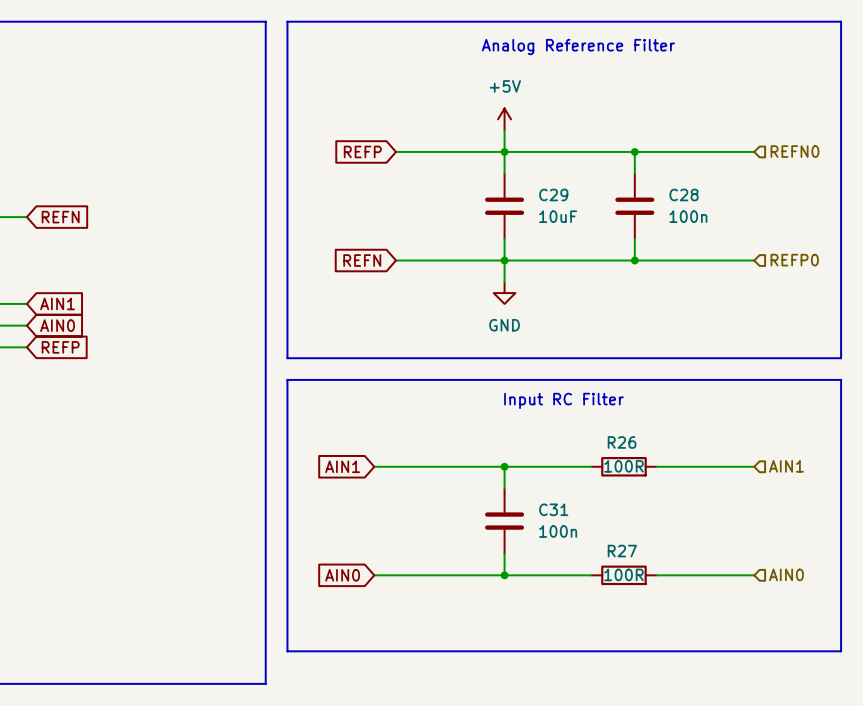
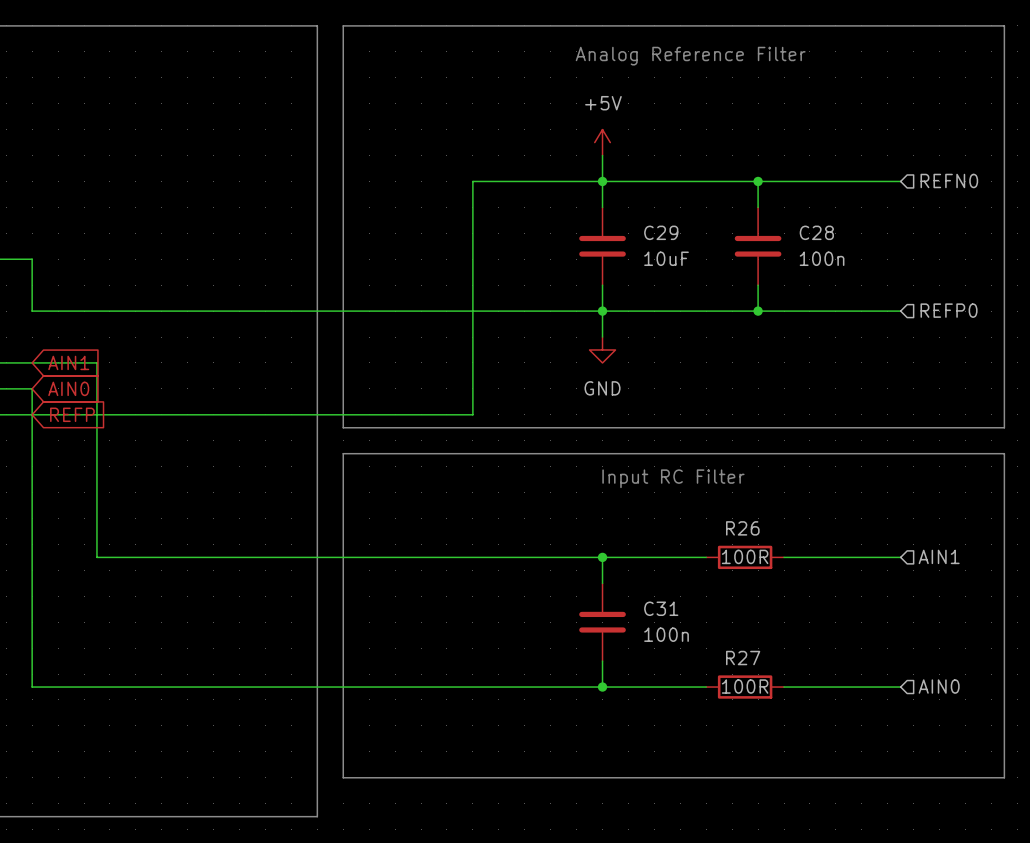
global label: REFP (362, 151) -> none
wire: none -> (472, 181) (472, 414) (32, 414)
wire: none -> (32, 259) (32, 311) (472, 311)
global label: REFN (60, 217) -> none
global label: REFN (362, 260) -> none
wire: none -> (32, 362) (96, 362) (96, 557) (446, 557)
wire: none -> (32, 388) (32, 687) (446, 687)
global label: AIN1 (342, 466) -> none
global label: AIN0 (342, 575) -> none

